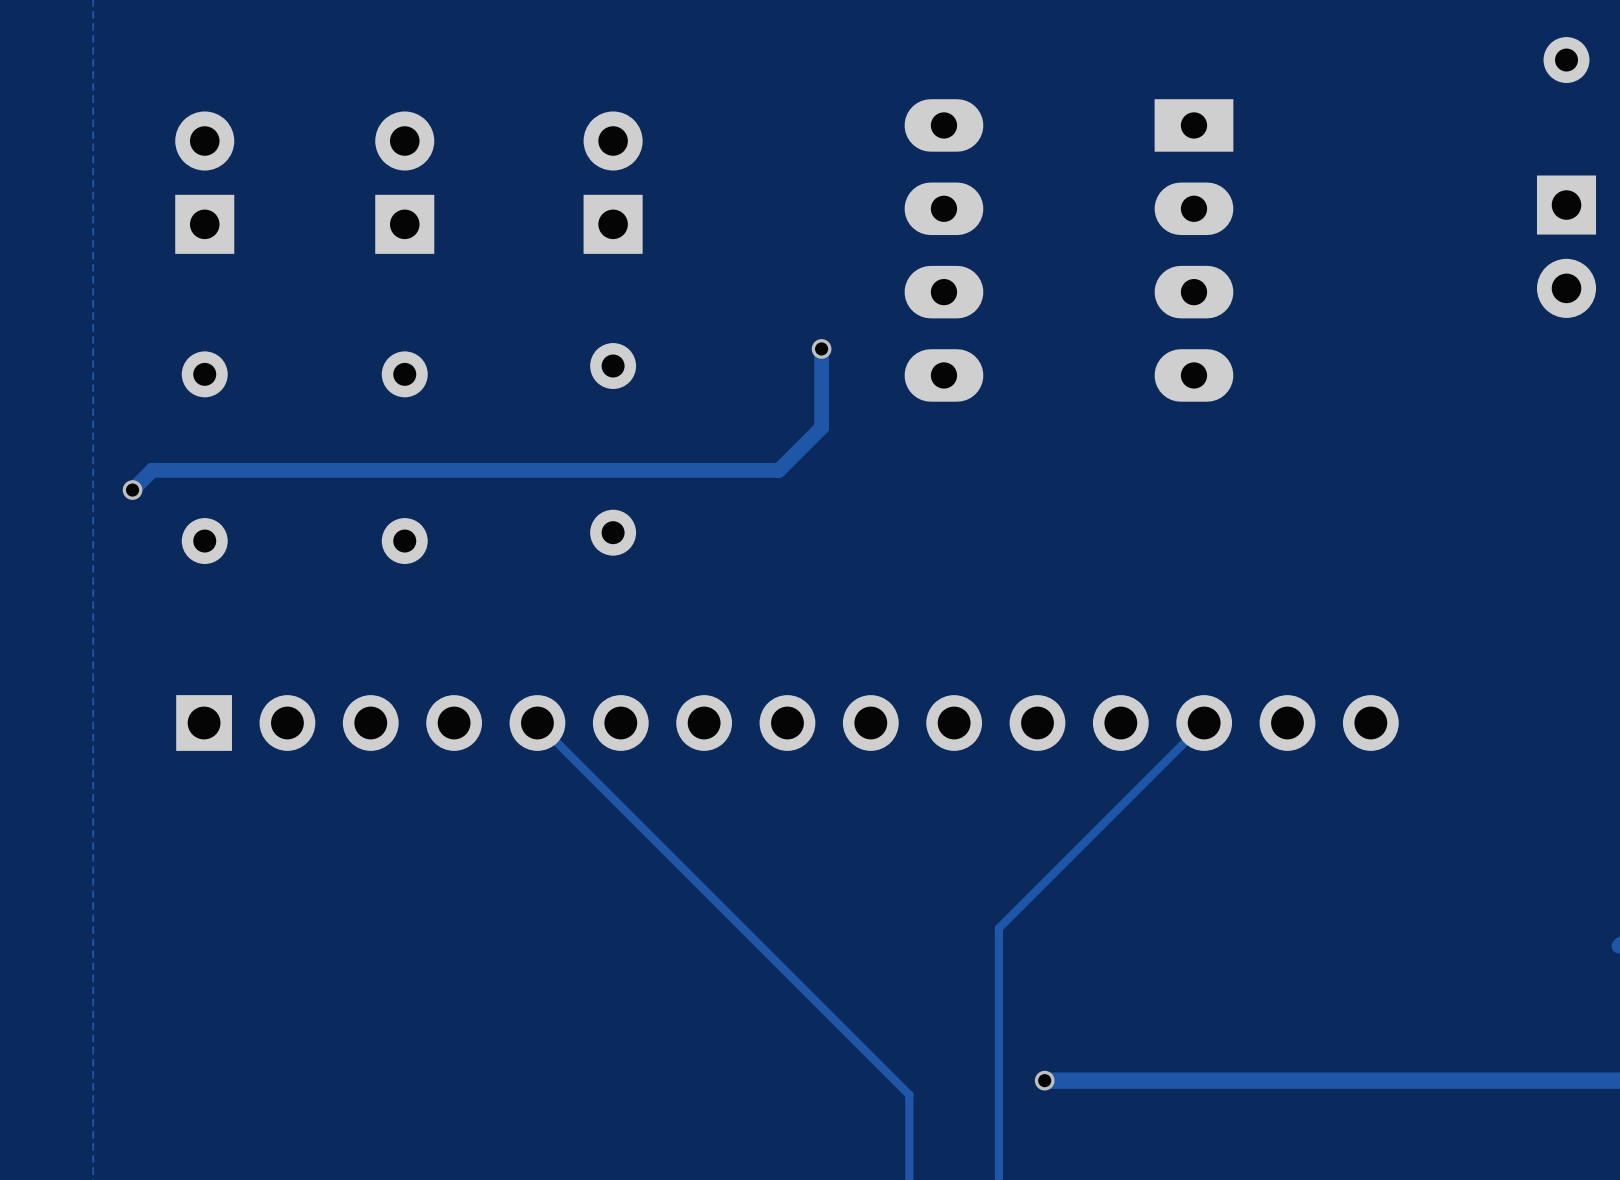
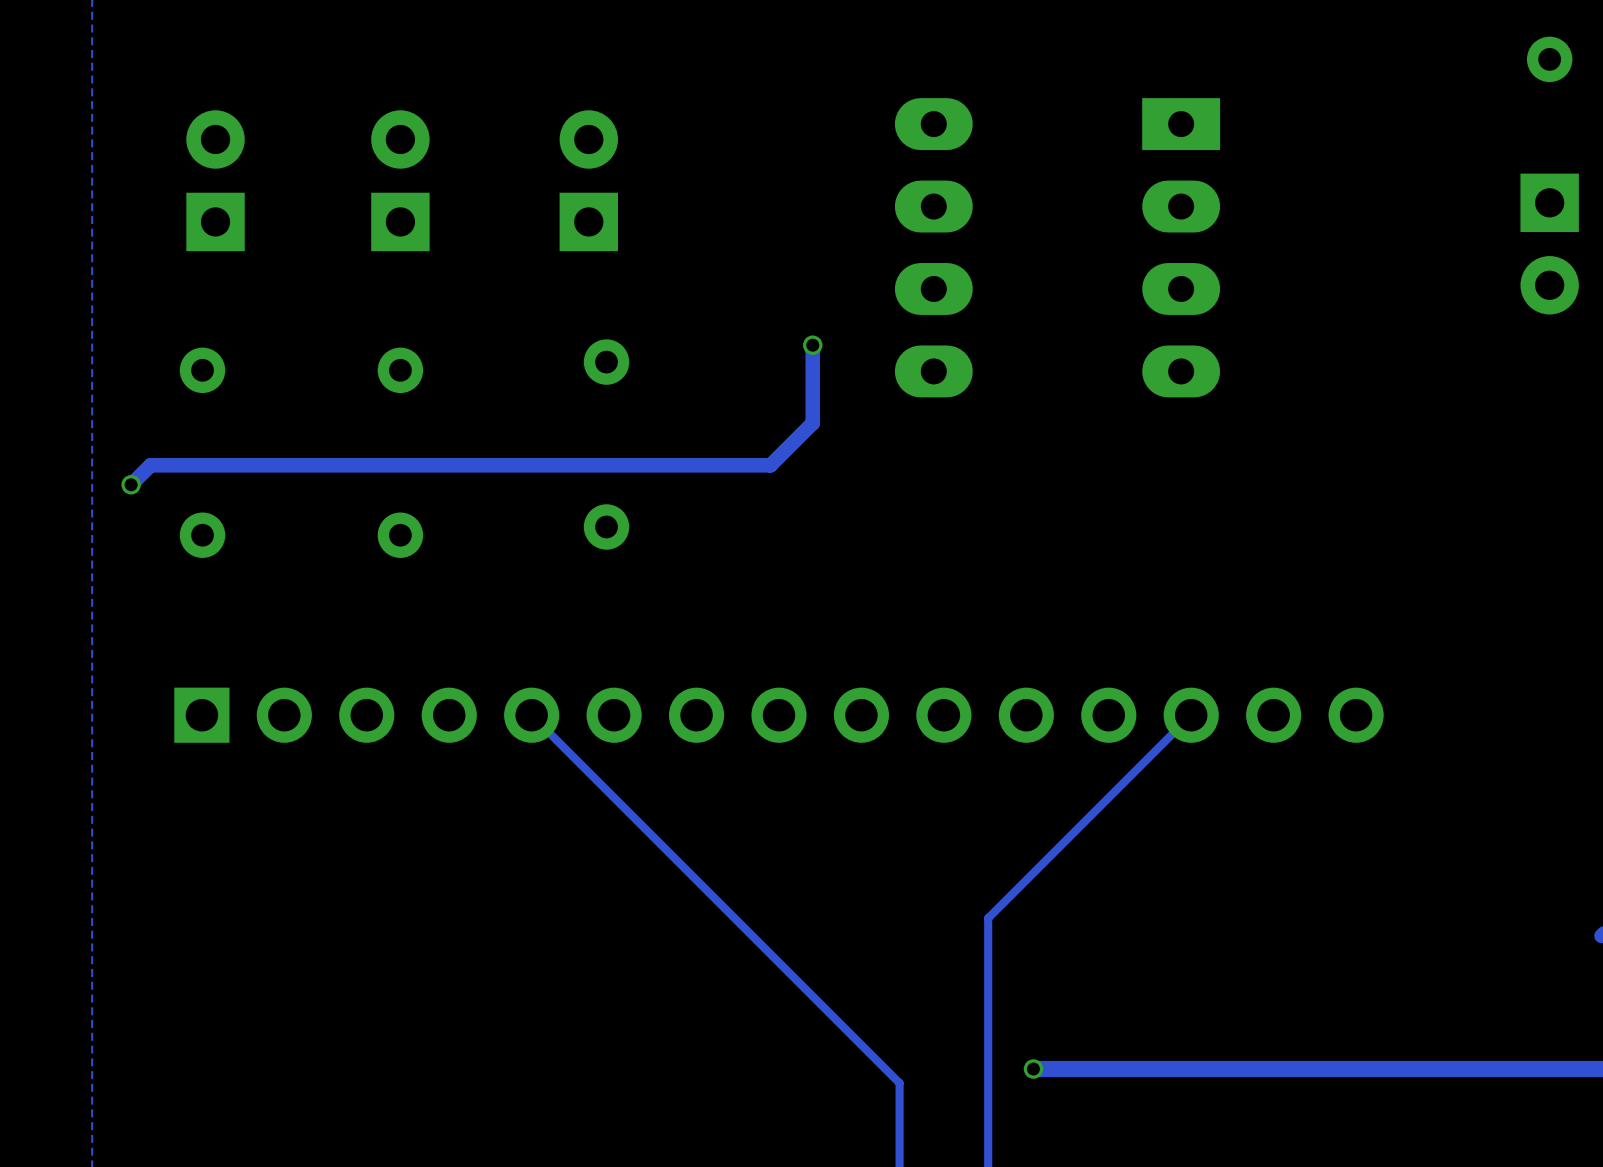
part position: (204, 182) -> (215, 180)
part position: (613, 182) -> (588, 180)

